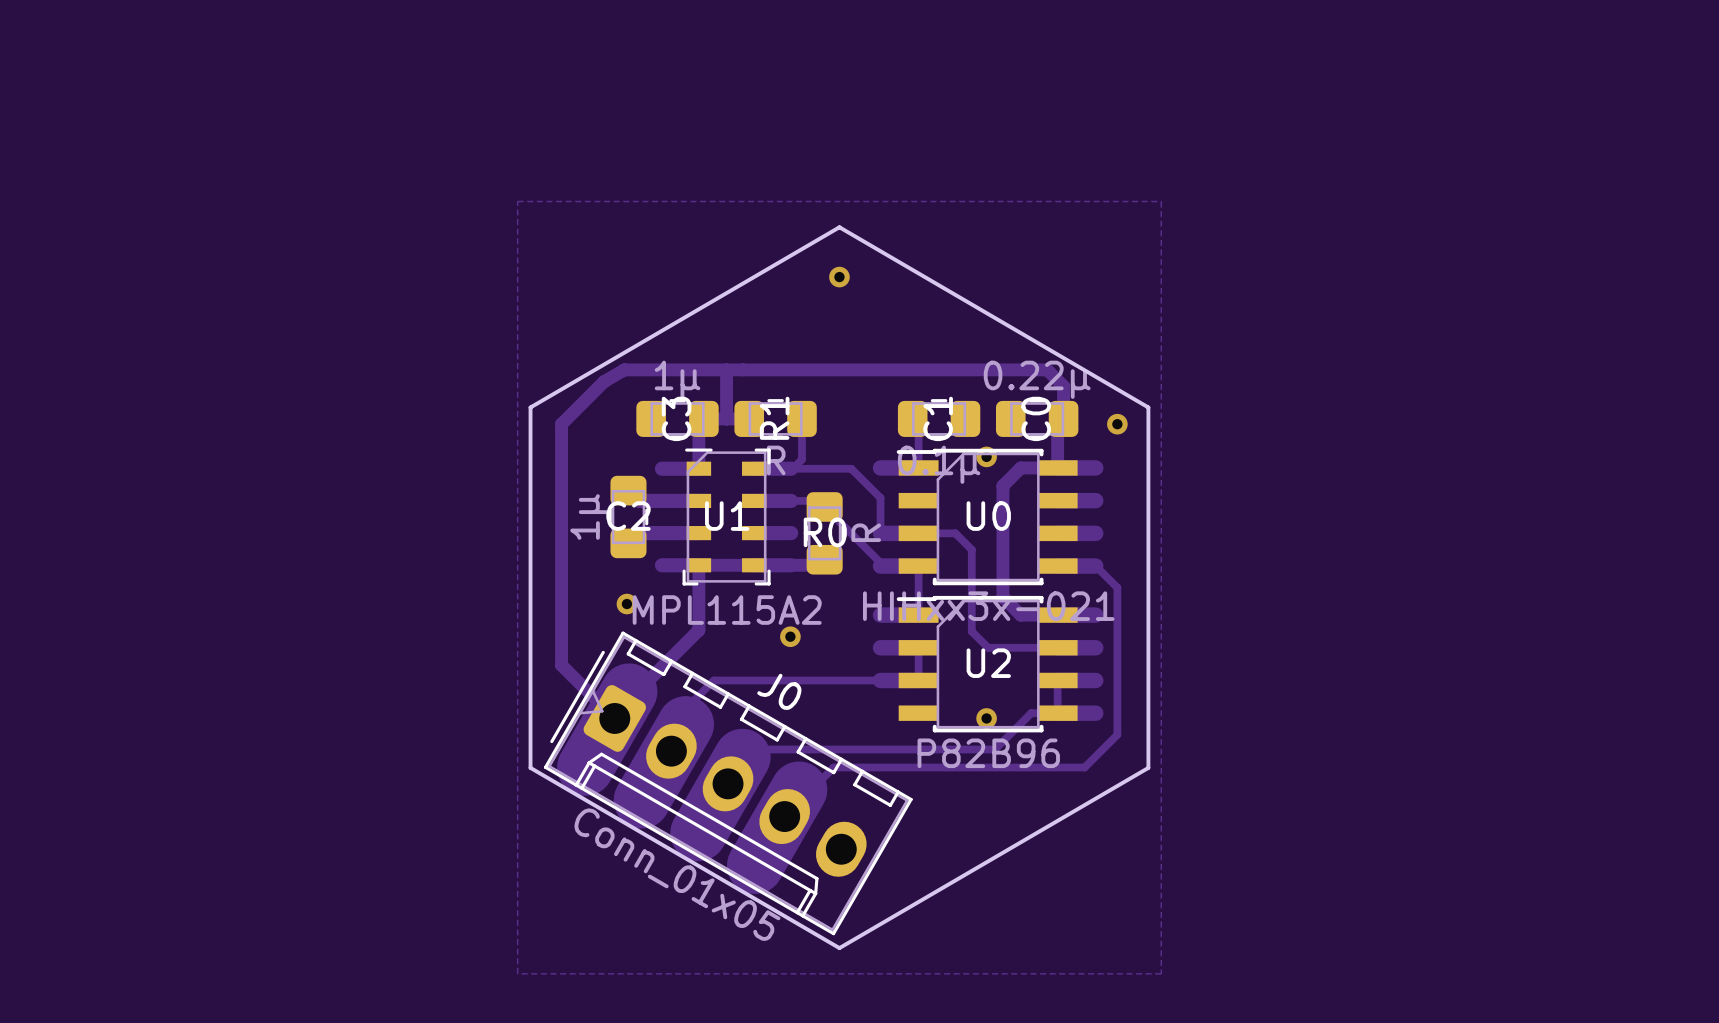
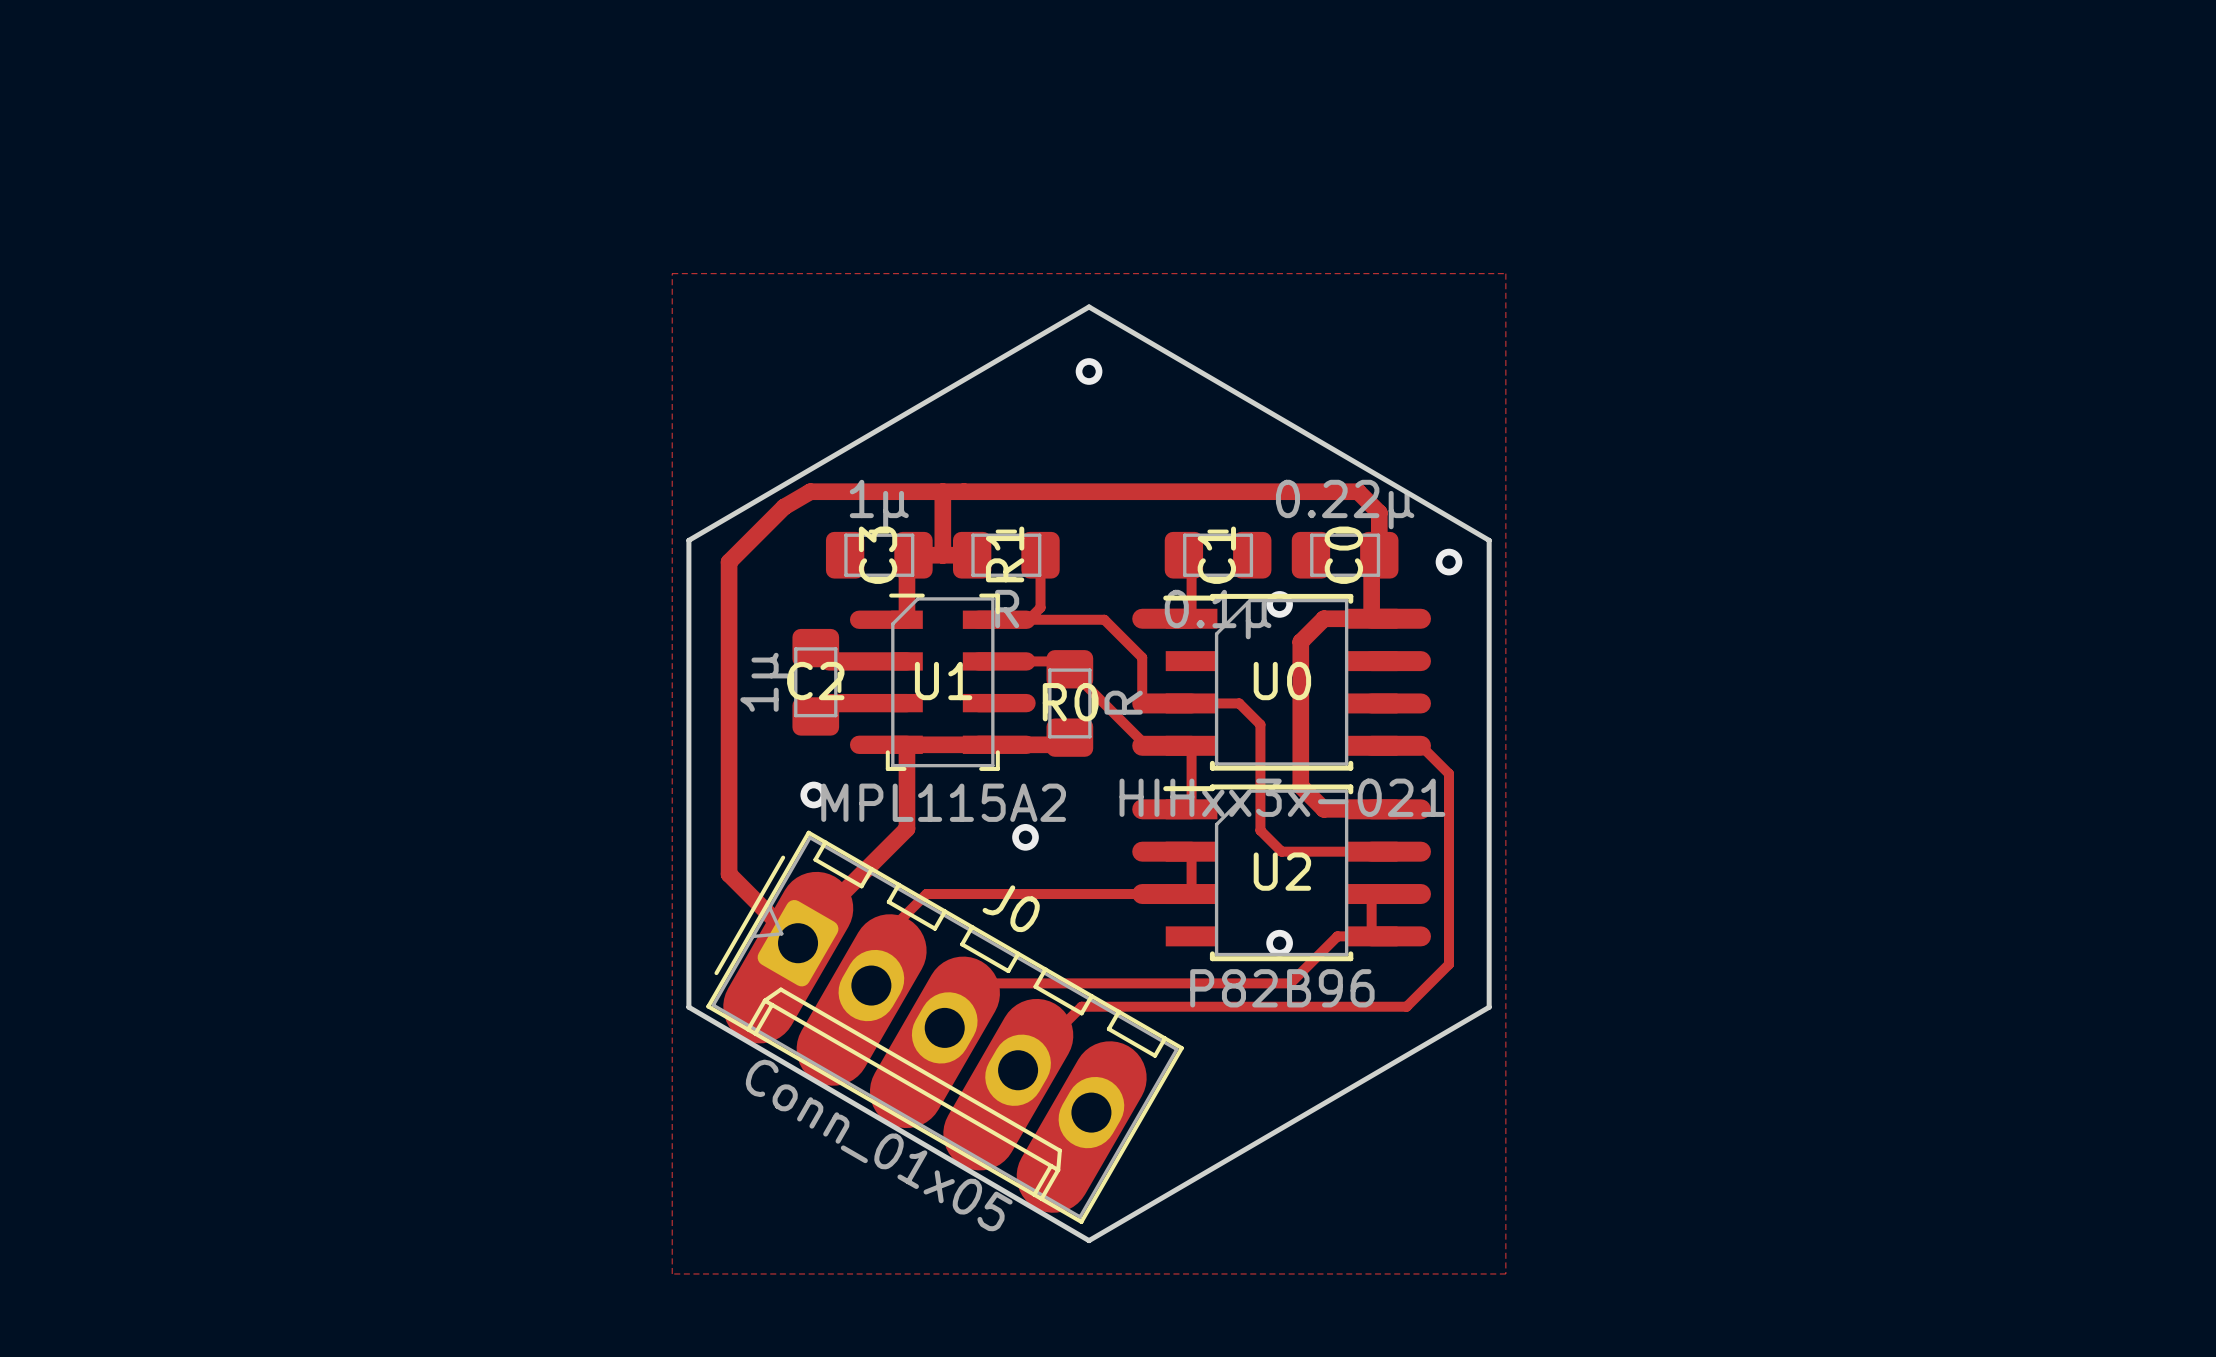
track: none -> (1110, 1077) (1053, 1176)

